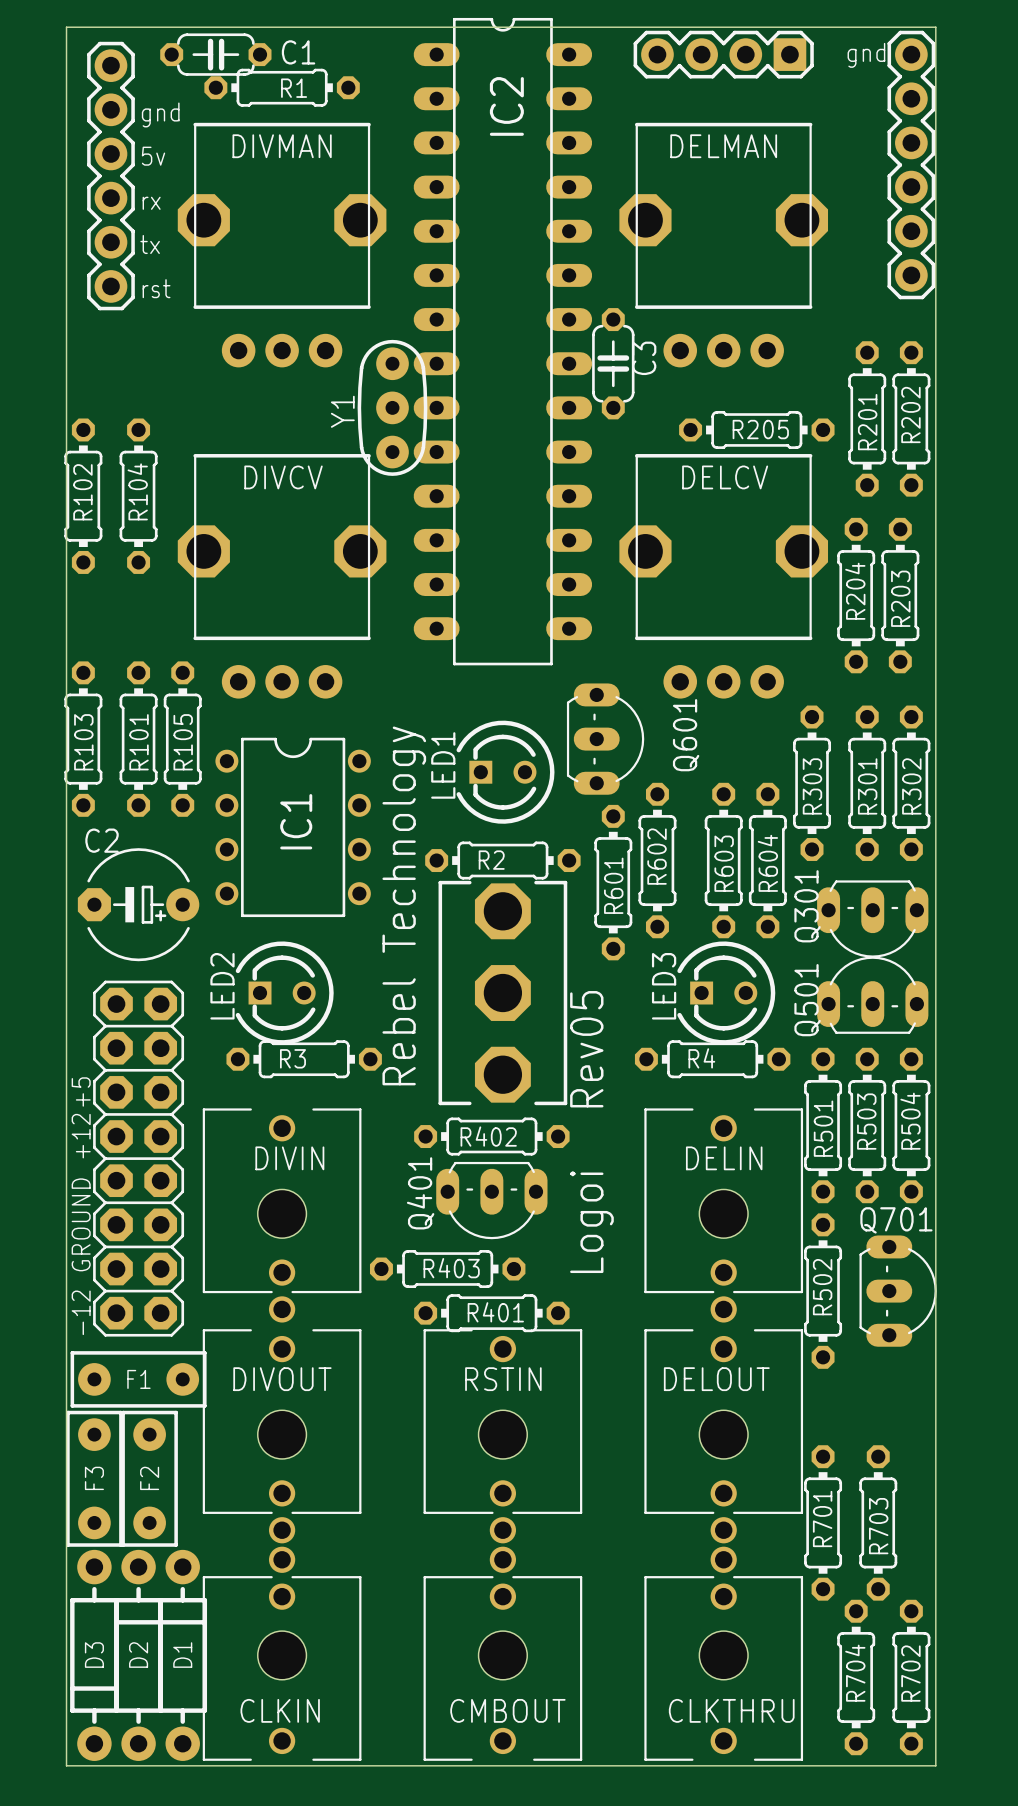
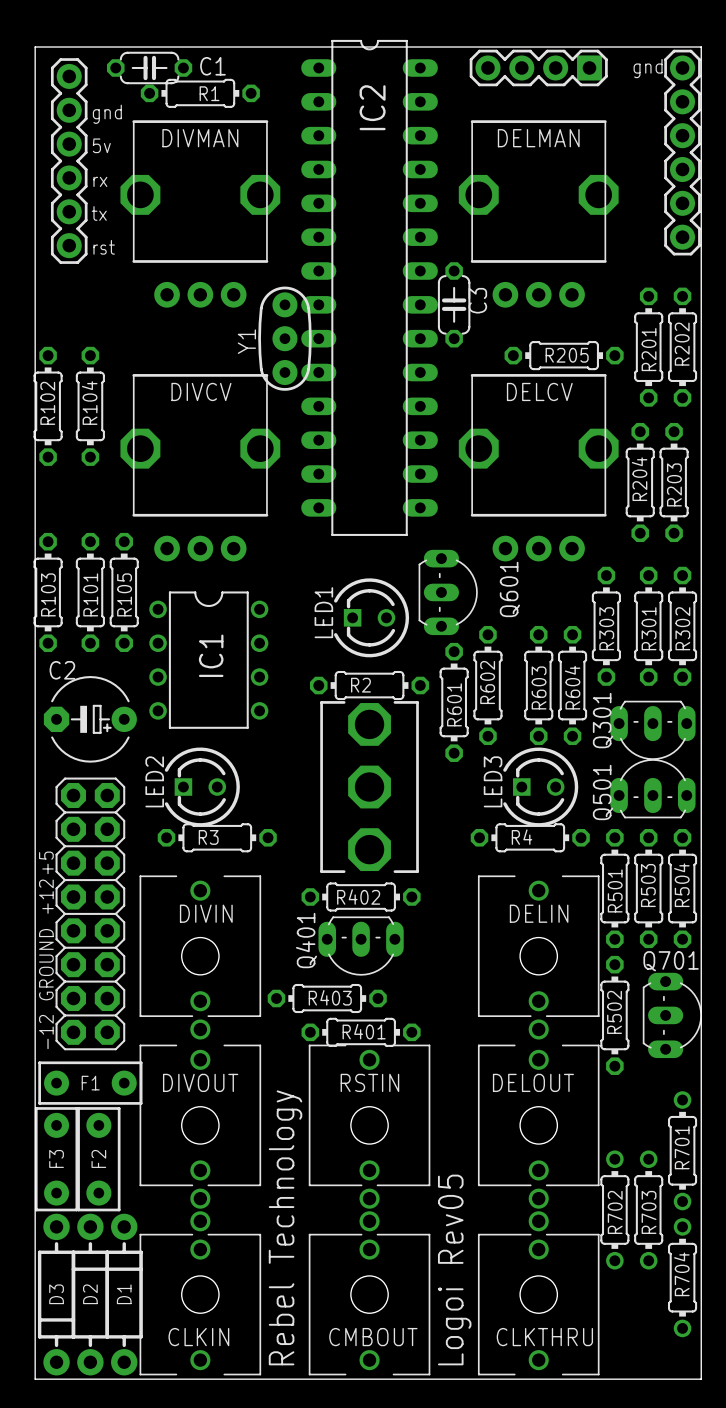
text: Rebel Technology (404, 905) -> none
text: Rev05 (586, 1049) -> none
text: Logoi (591, 1222) -> none
R701 footprint: [804, 1445, 843, 1601] -> [667, 1091, 698, 1211]
R703 footprint: [859, 1445, 898, 1601] -> [634, 1150, 664, 1270]
text: none -> Rebel Technology (285, 1227)
R704 footprint: [837, 1599, 876, 1756] -> [667, 1218, 698, 1338]
R702 footprint: [892, 1599, 931, 1756] -> [600, 1150, 630, 1270]
text: none -> Logoi Rev05 (454, 1269)

